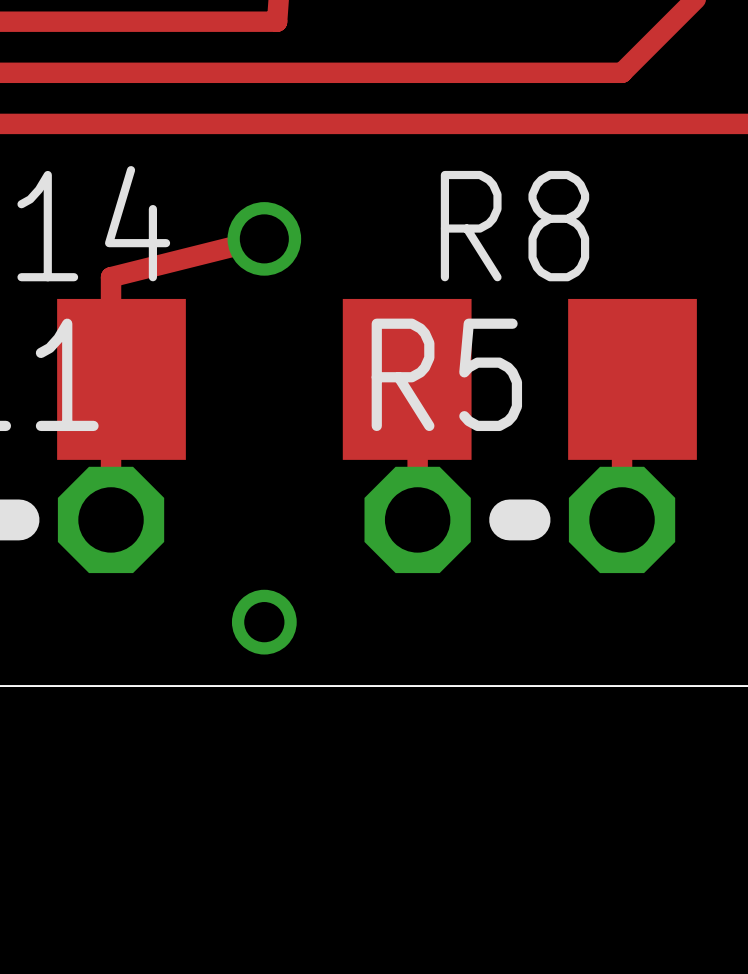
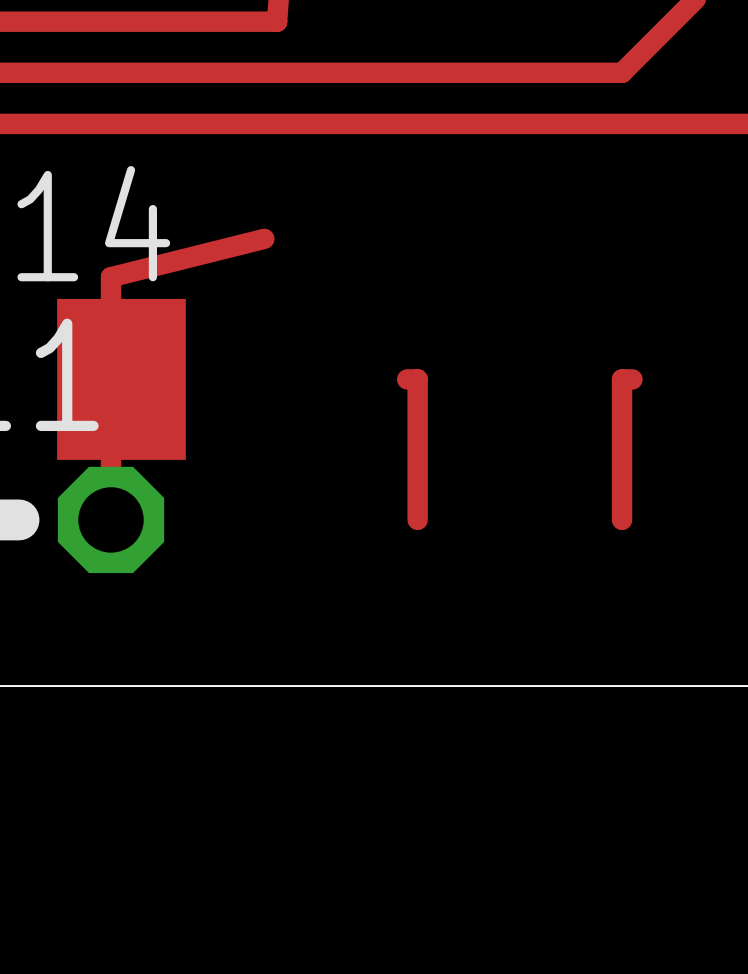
via: (264, 238) -> none
R8: (519, 379) -> none
R5: (519, 519) -> none
via: (264, 622) -> none

